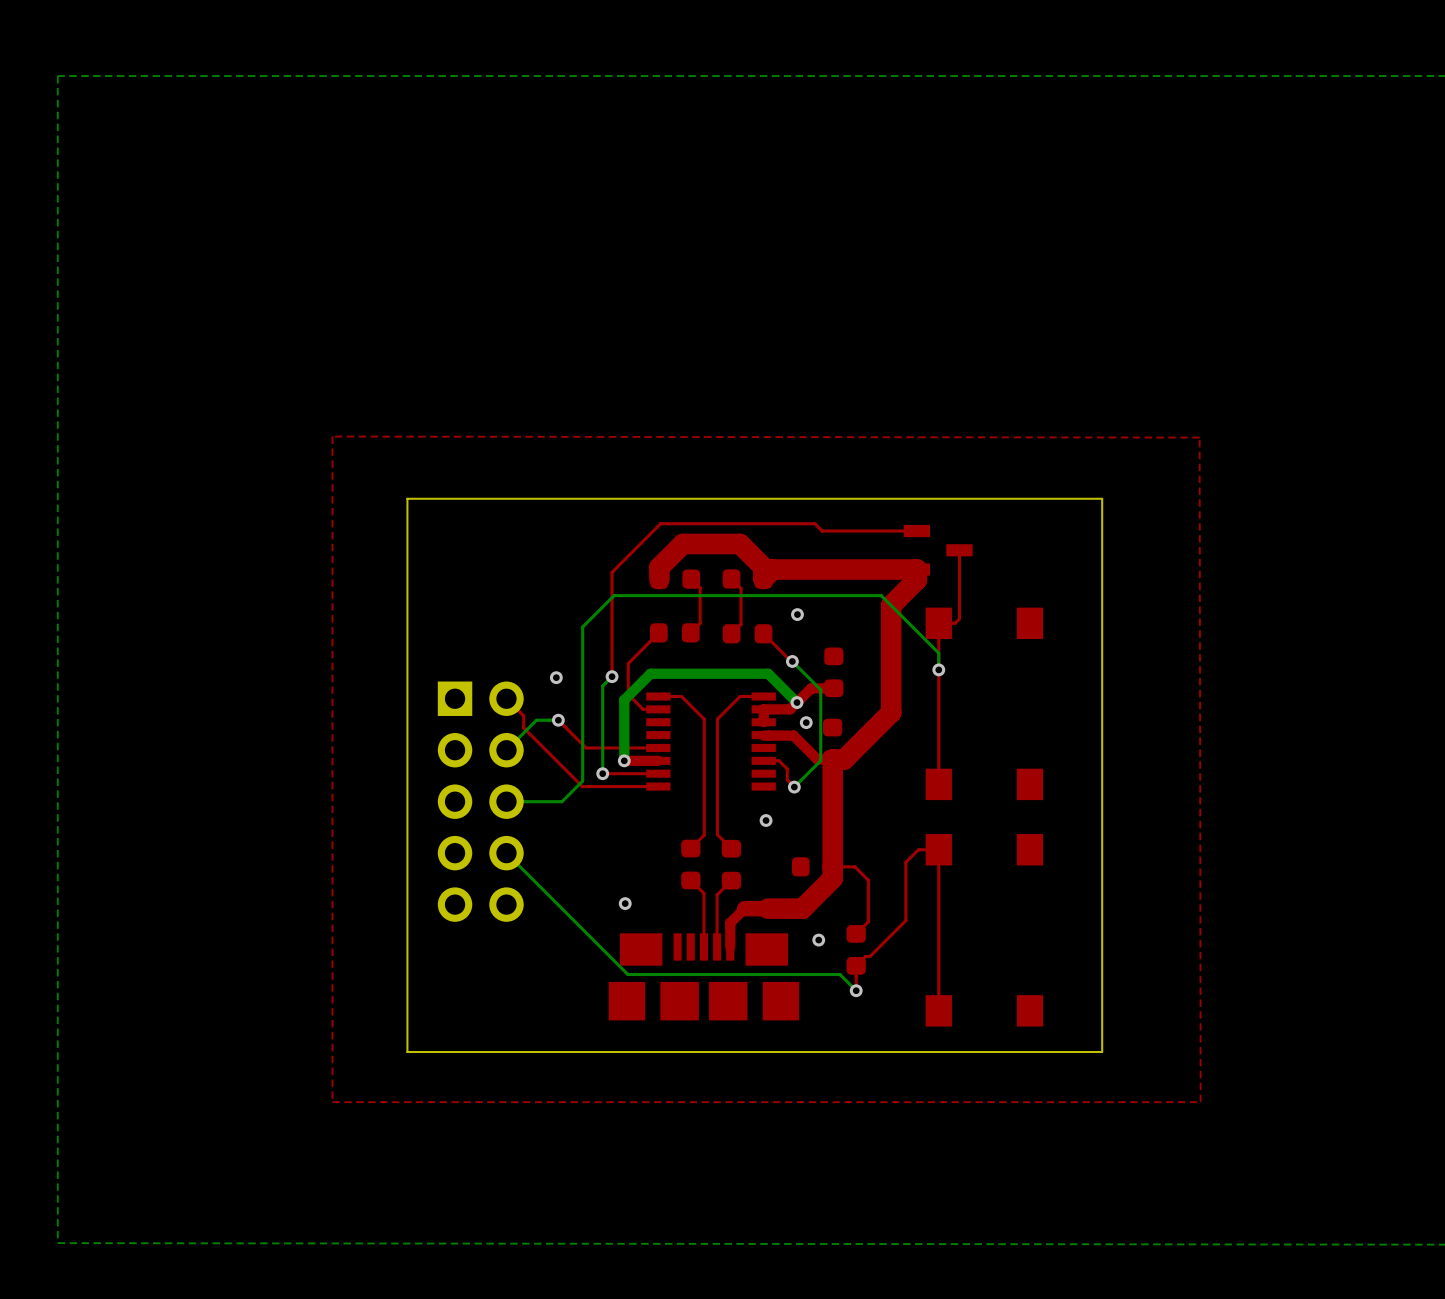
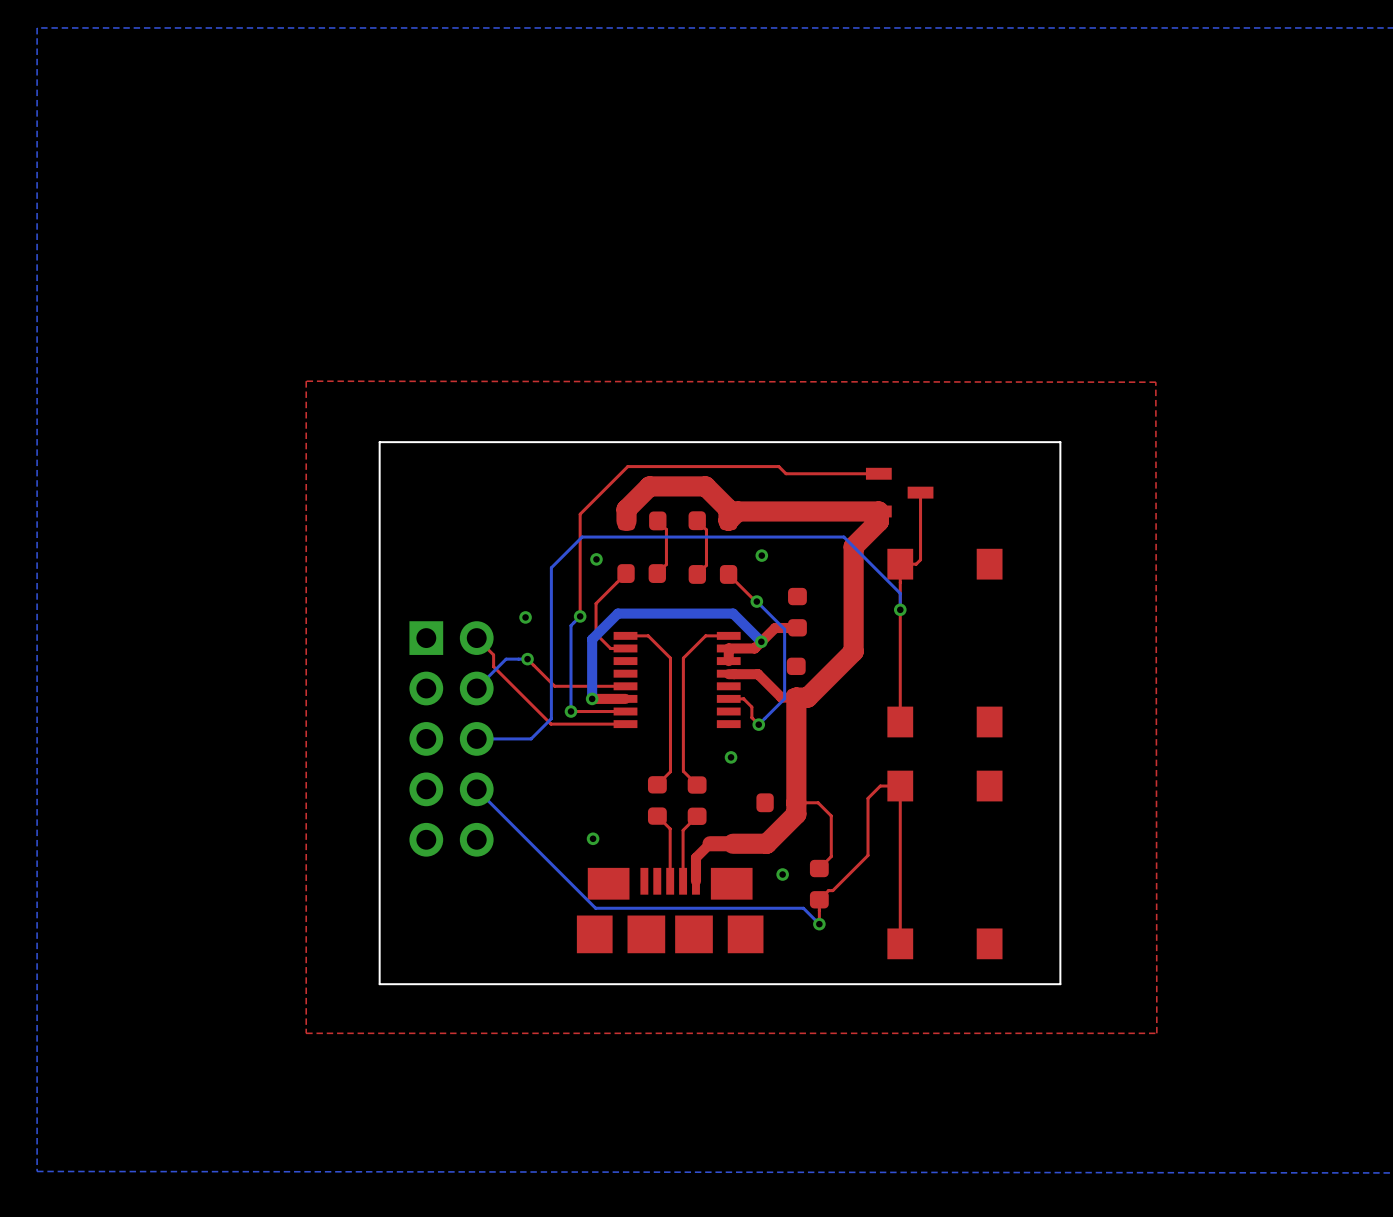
via: none -> (596, 559)
via: (806, 722) -> none

